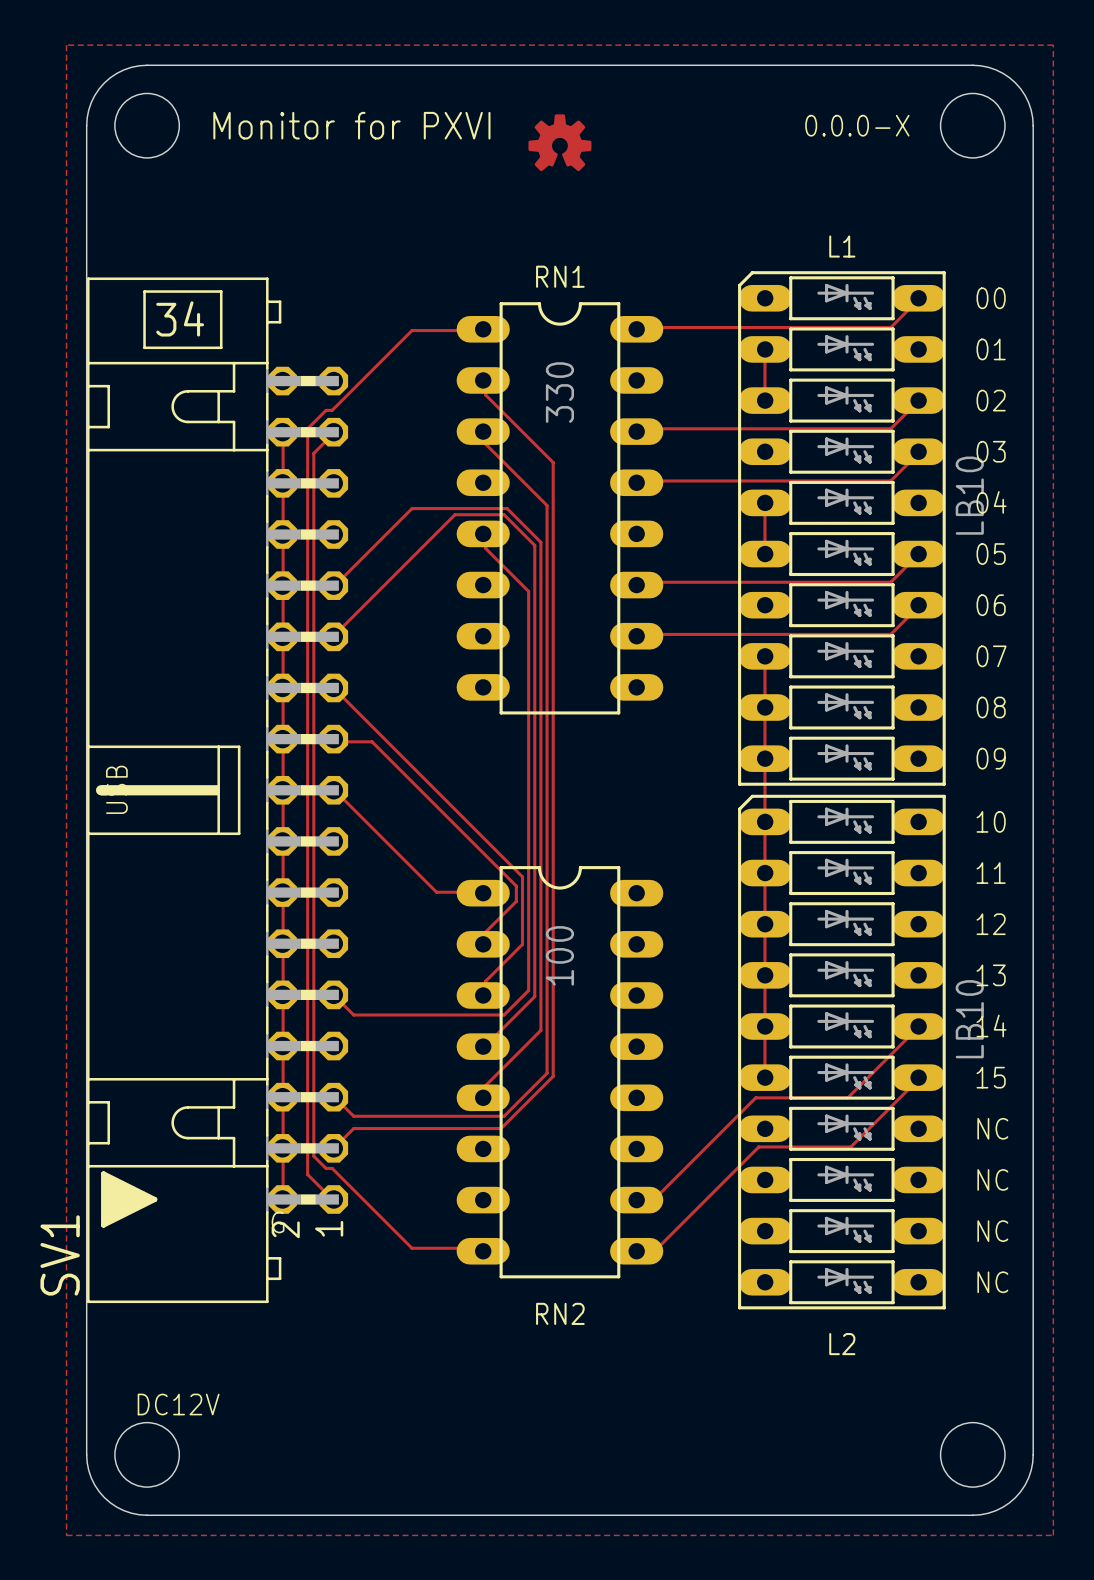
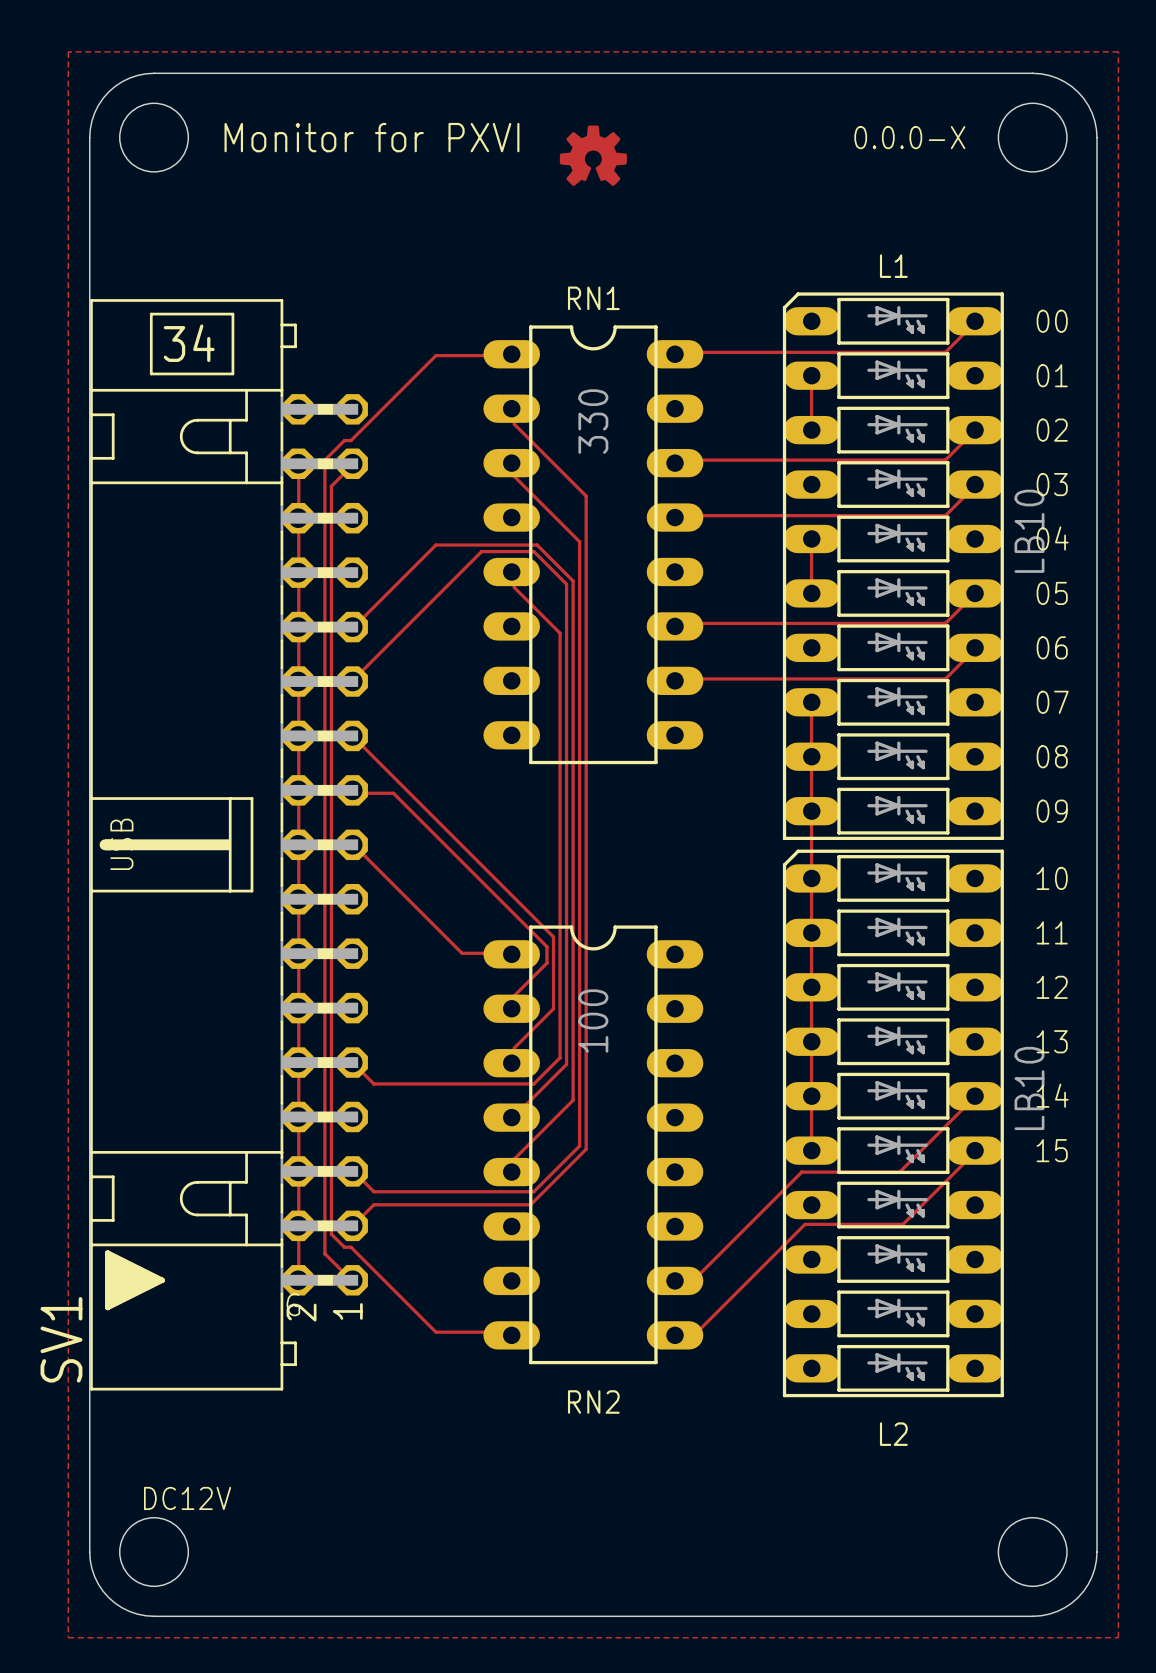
text: NC (992, 1128) -> none
text: NC (992, 1179) -> none
text: NC (992, 1231) -> none
text: NC (992, 1282) -> none

